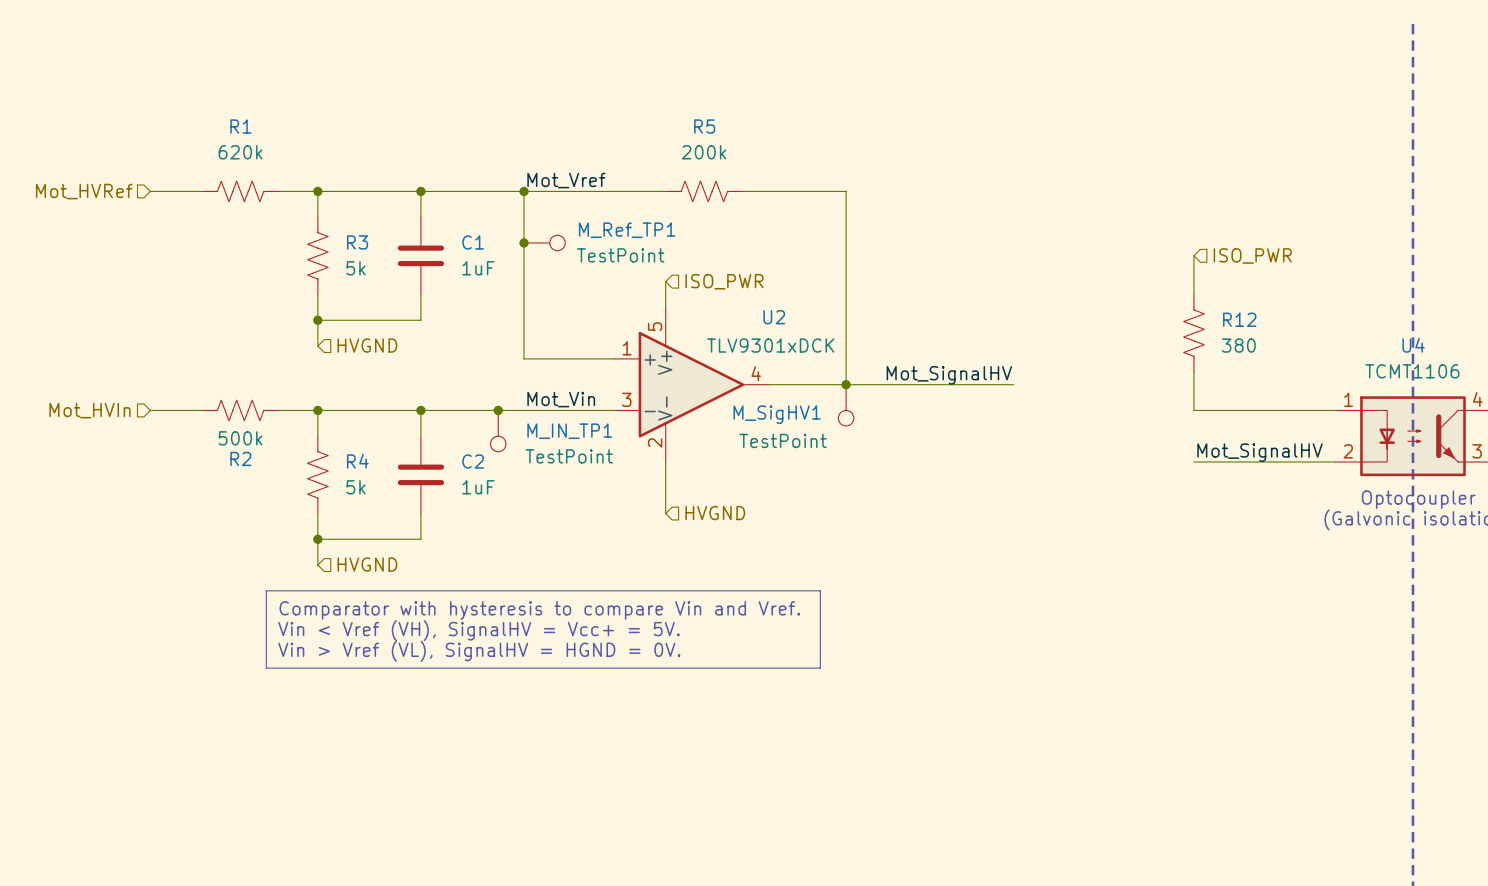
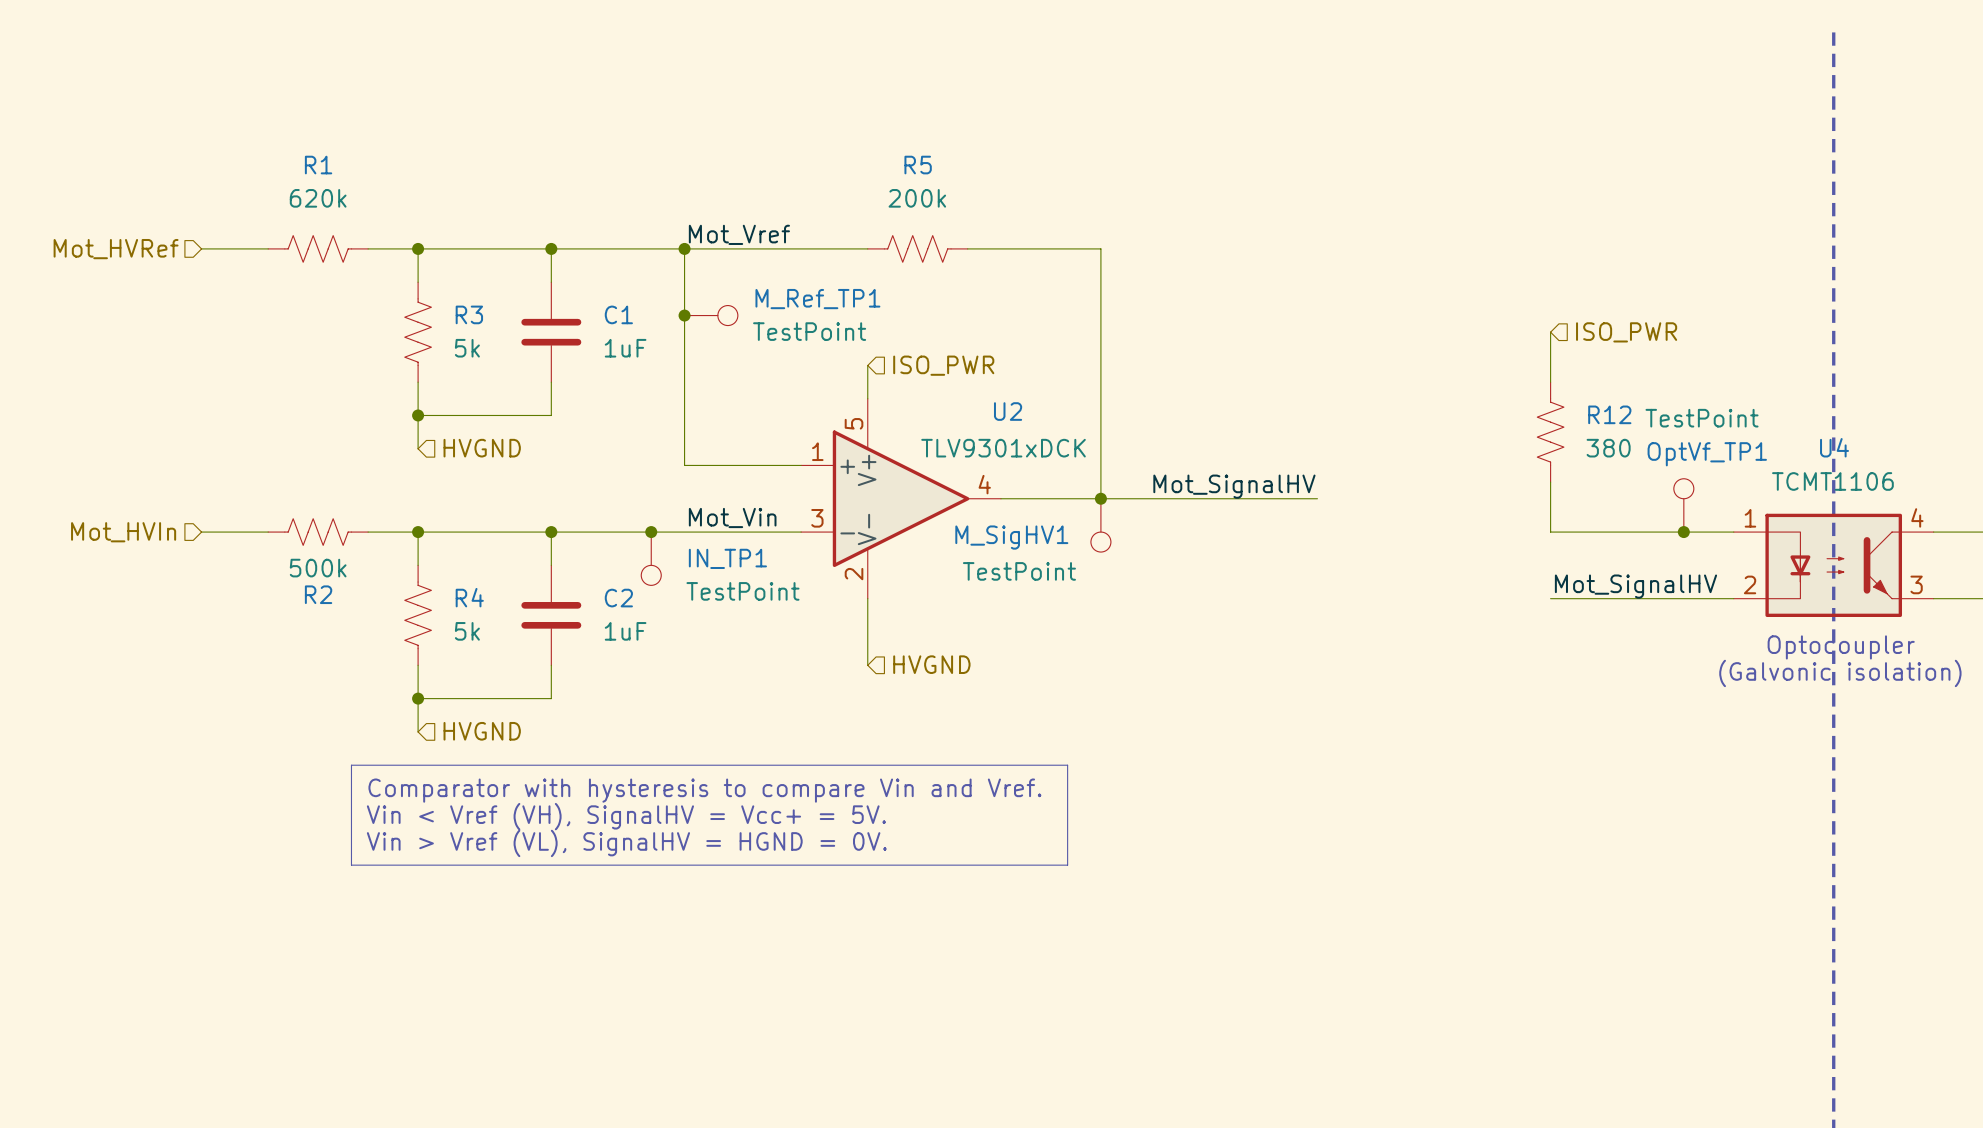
OptVf_TP1: none -> TestPoint (1683, 505)
junction: none -> (1683, 532)
M_IN_TP1 name: M_IN_TP1 (569, 431) -> IN_TP1 (727, 558)

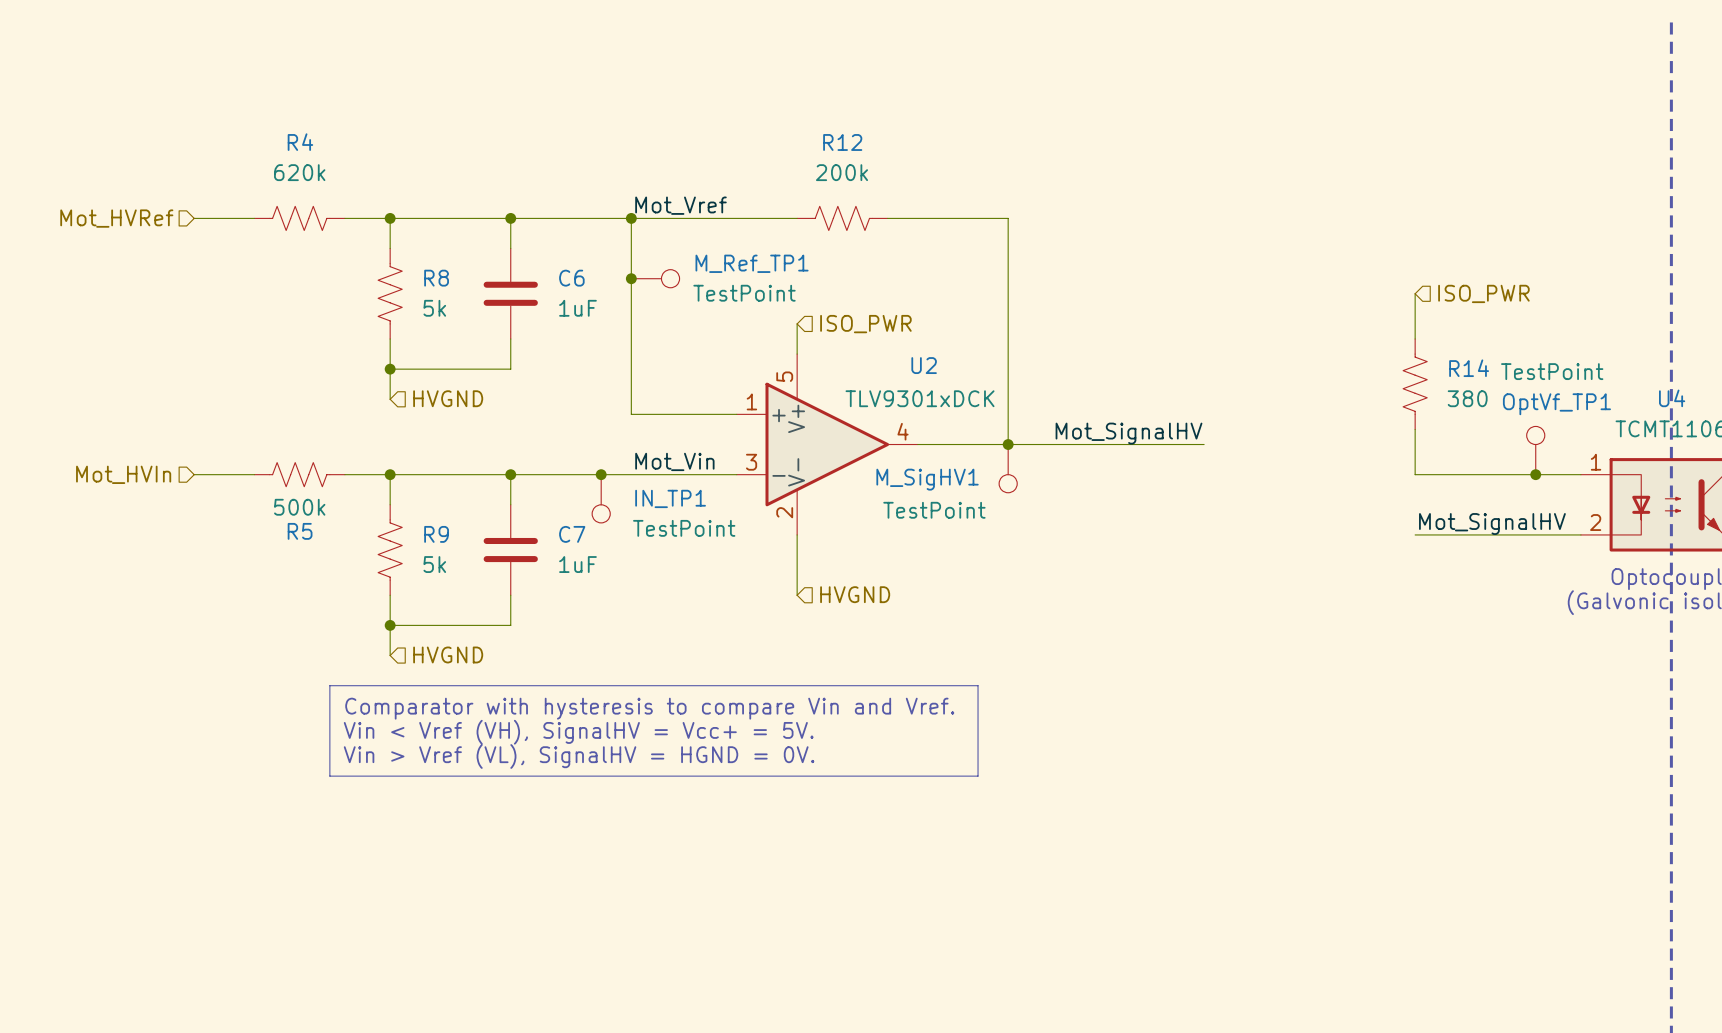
R1 name: R1 (318, 165) -> R4 (300, 142)
R5 name: R5 (918, 165) -> R12 (842, 142)
R3 name: R3 (469, 314) -> R8 (436, 278)
C1 name: C1 (618, 314) -> C6 (571, 278)
R12 name: R12 (1609, 414) -> R14 (1469, 368)
R2 name: R2 (318, 594) -> R5 (300, 531)
R4 name: R4 (469, 597) -> R9 (436, 534)
C2 name: C2 (618, 598) -> C7 (572, 534)

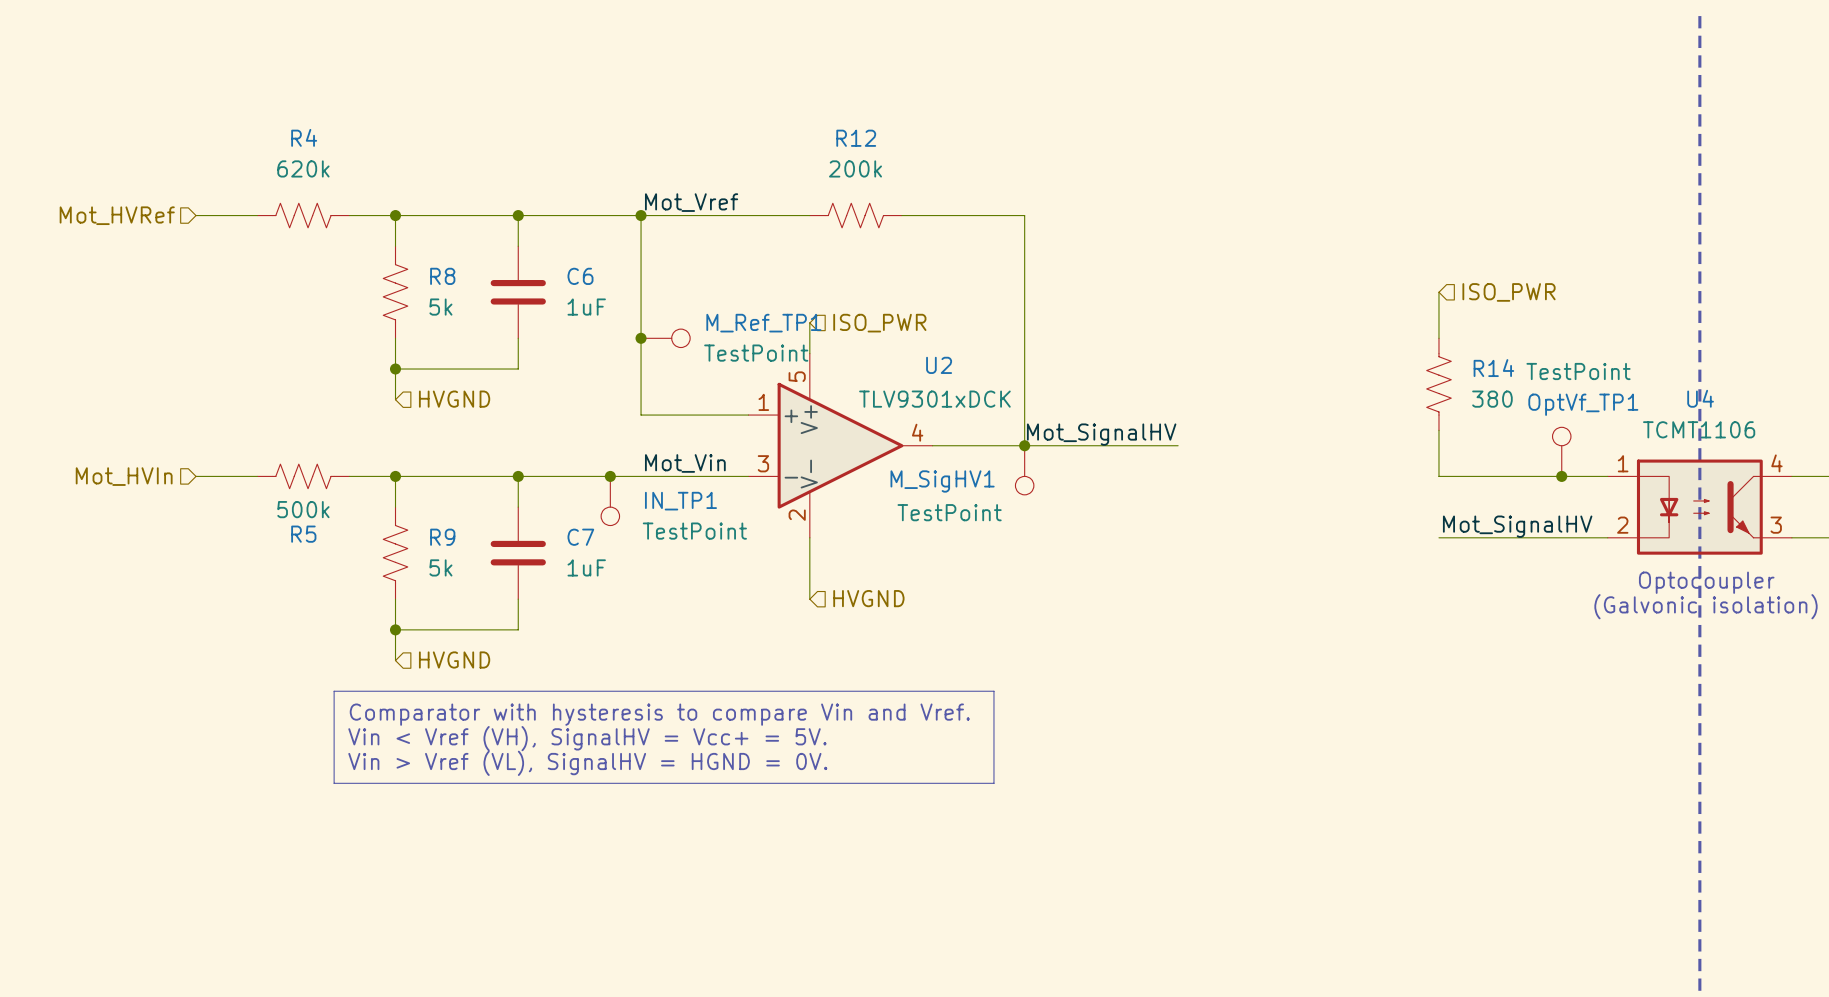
junction position: (631, 278) -> (641, 338)
M_Ref_TP1 position: (655, 278) -> (665, 338)
label position: Mot_SignalHV (1129, 433) -> Mot_SignalHV (1101, 434)
wire: (1158, 444) (1204, 444) -> none

